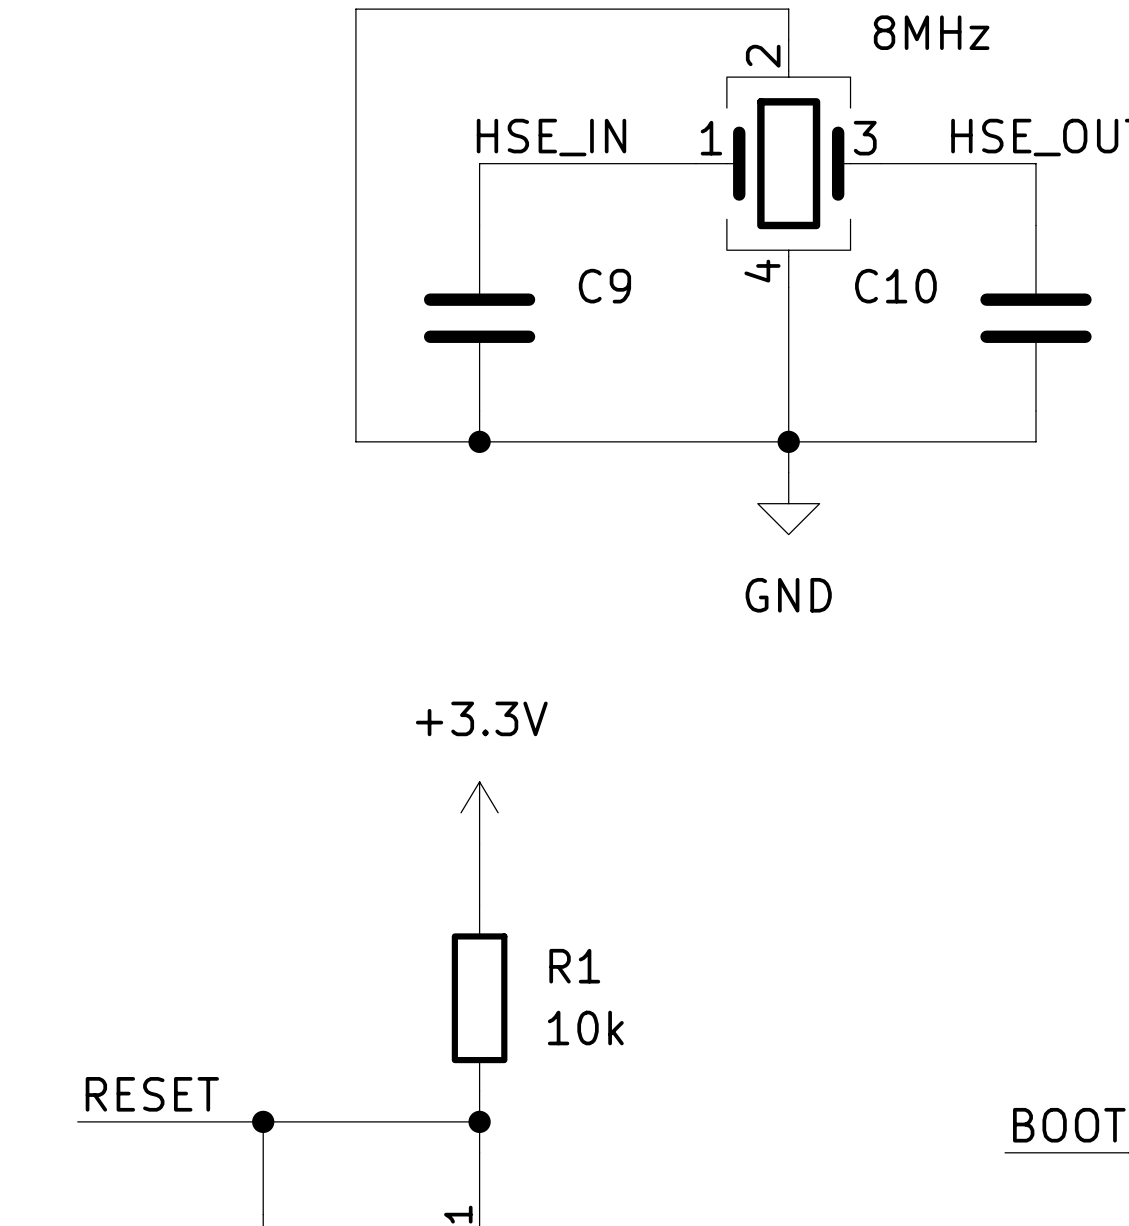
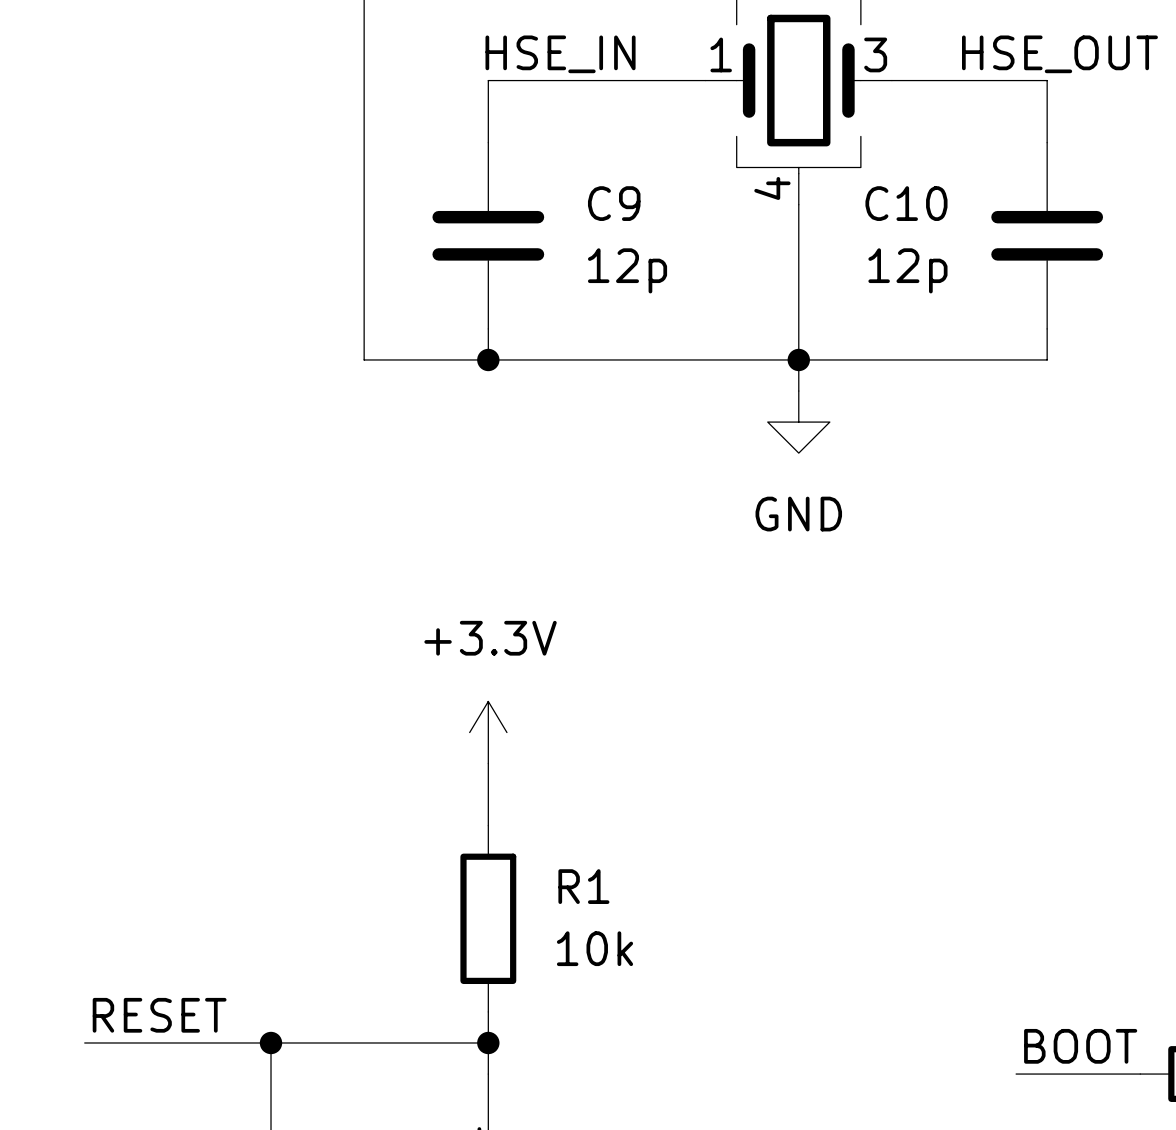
C9 value: none -> 12p (627, 270)
C10 value: none -> 12p (907, 270)

